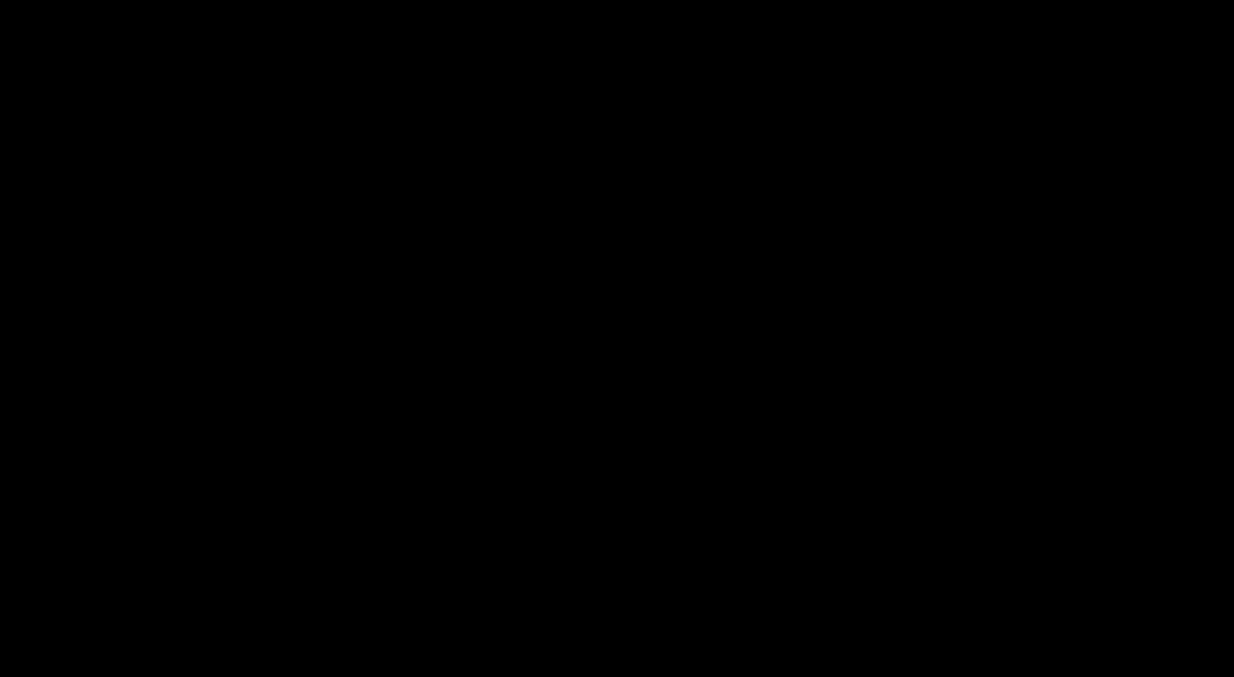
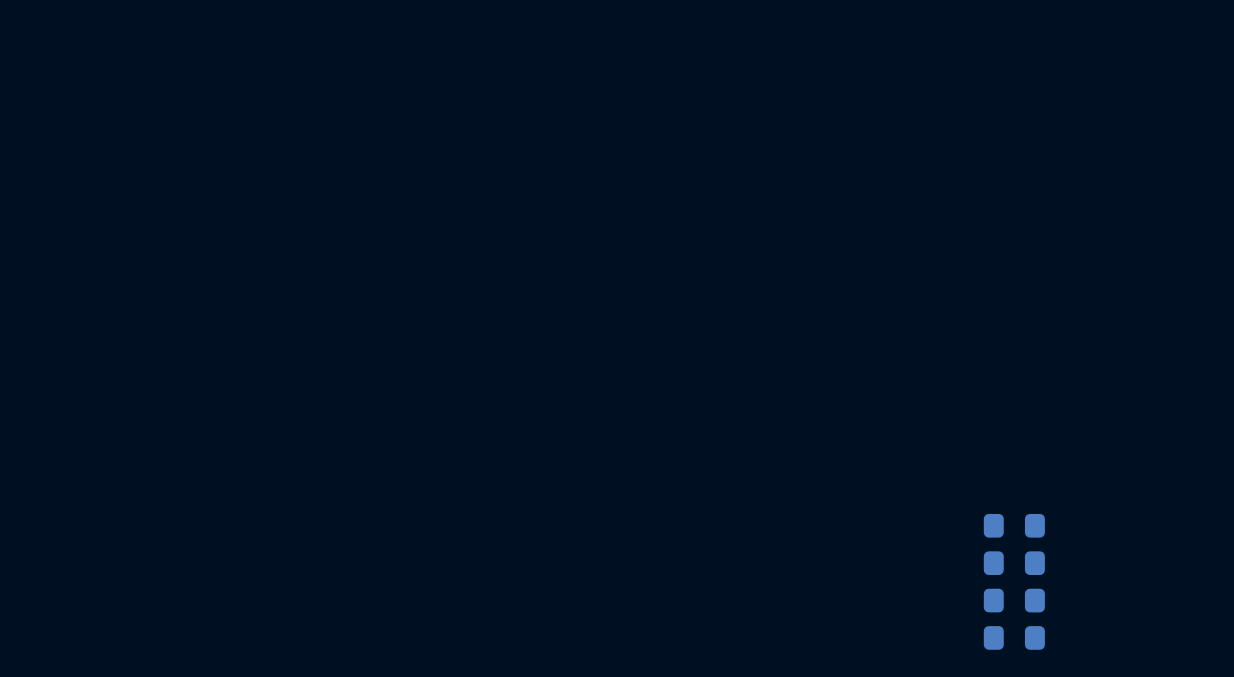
part: none -> (1014, 525)
part: none -> (1014, 563)
part: none -> (1014, 600)
part: none -> (1014, 637)

